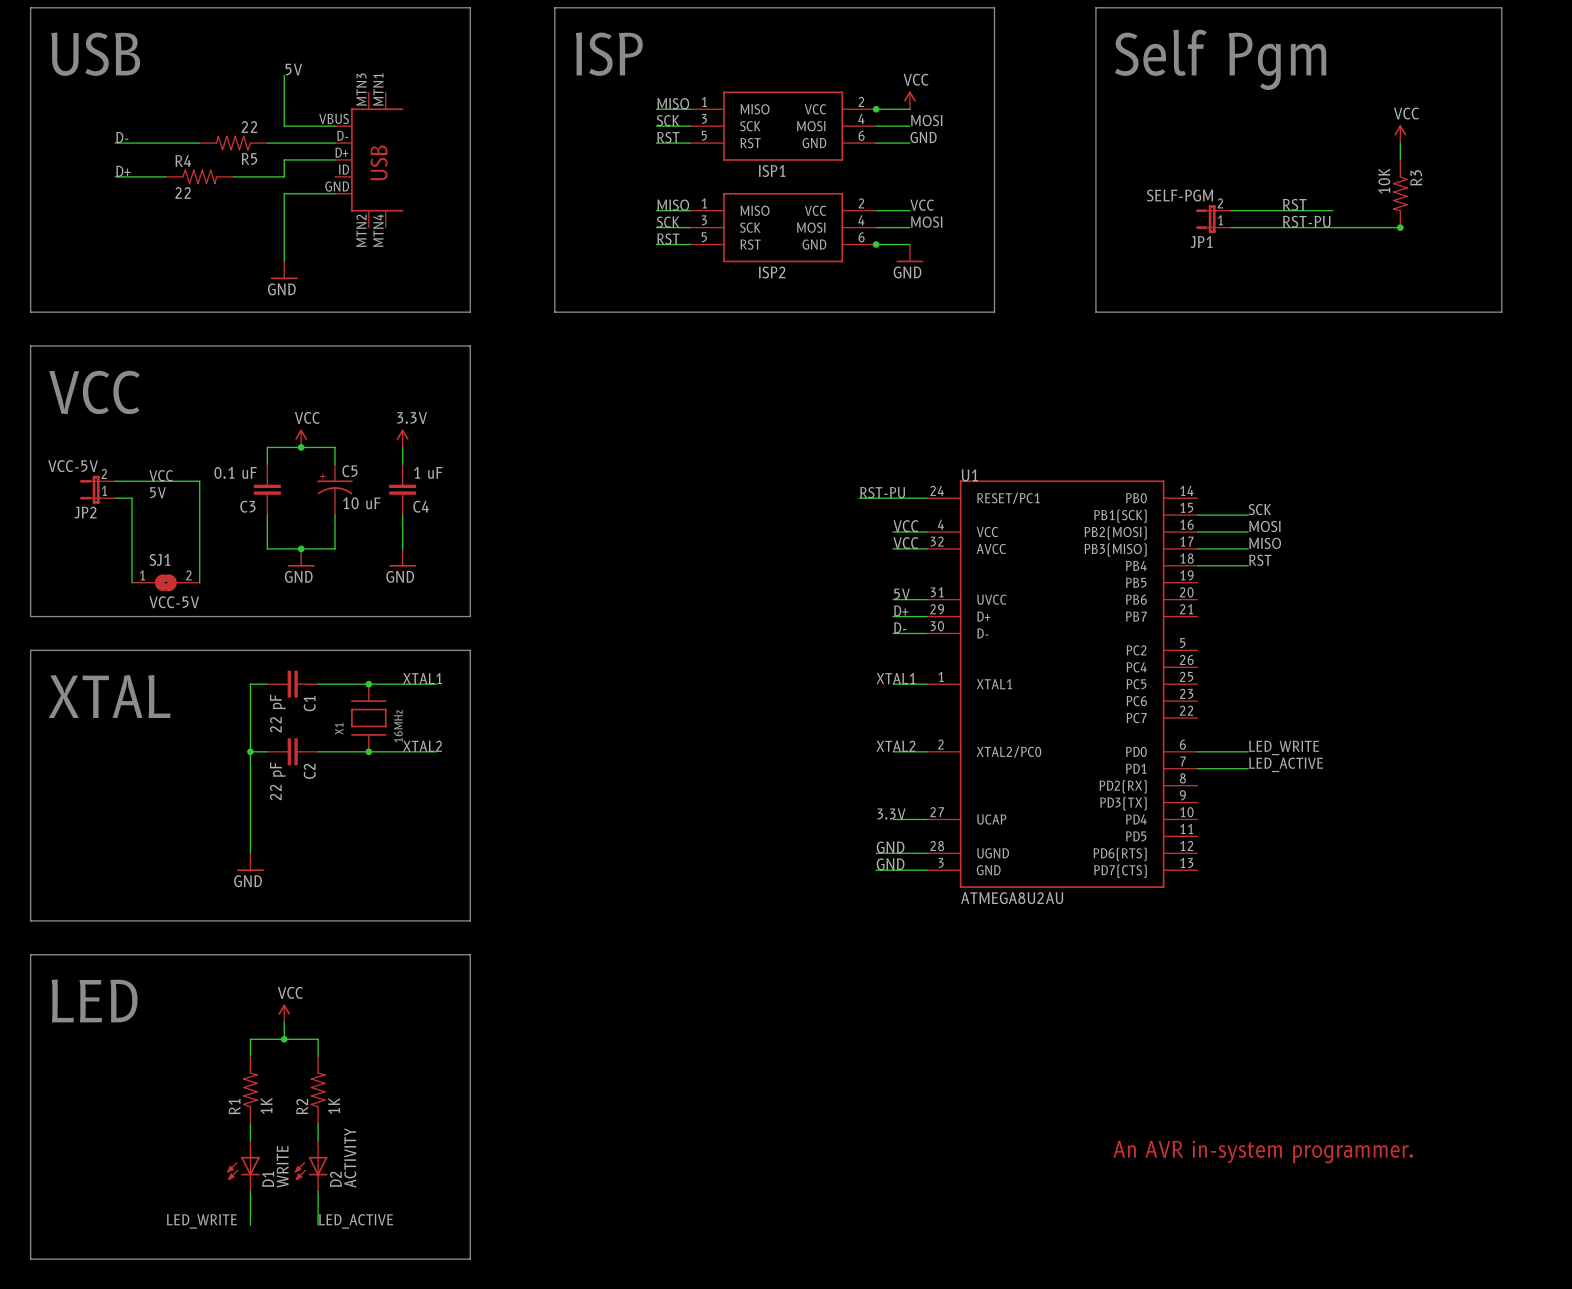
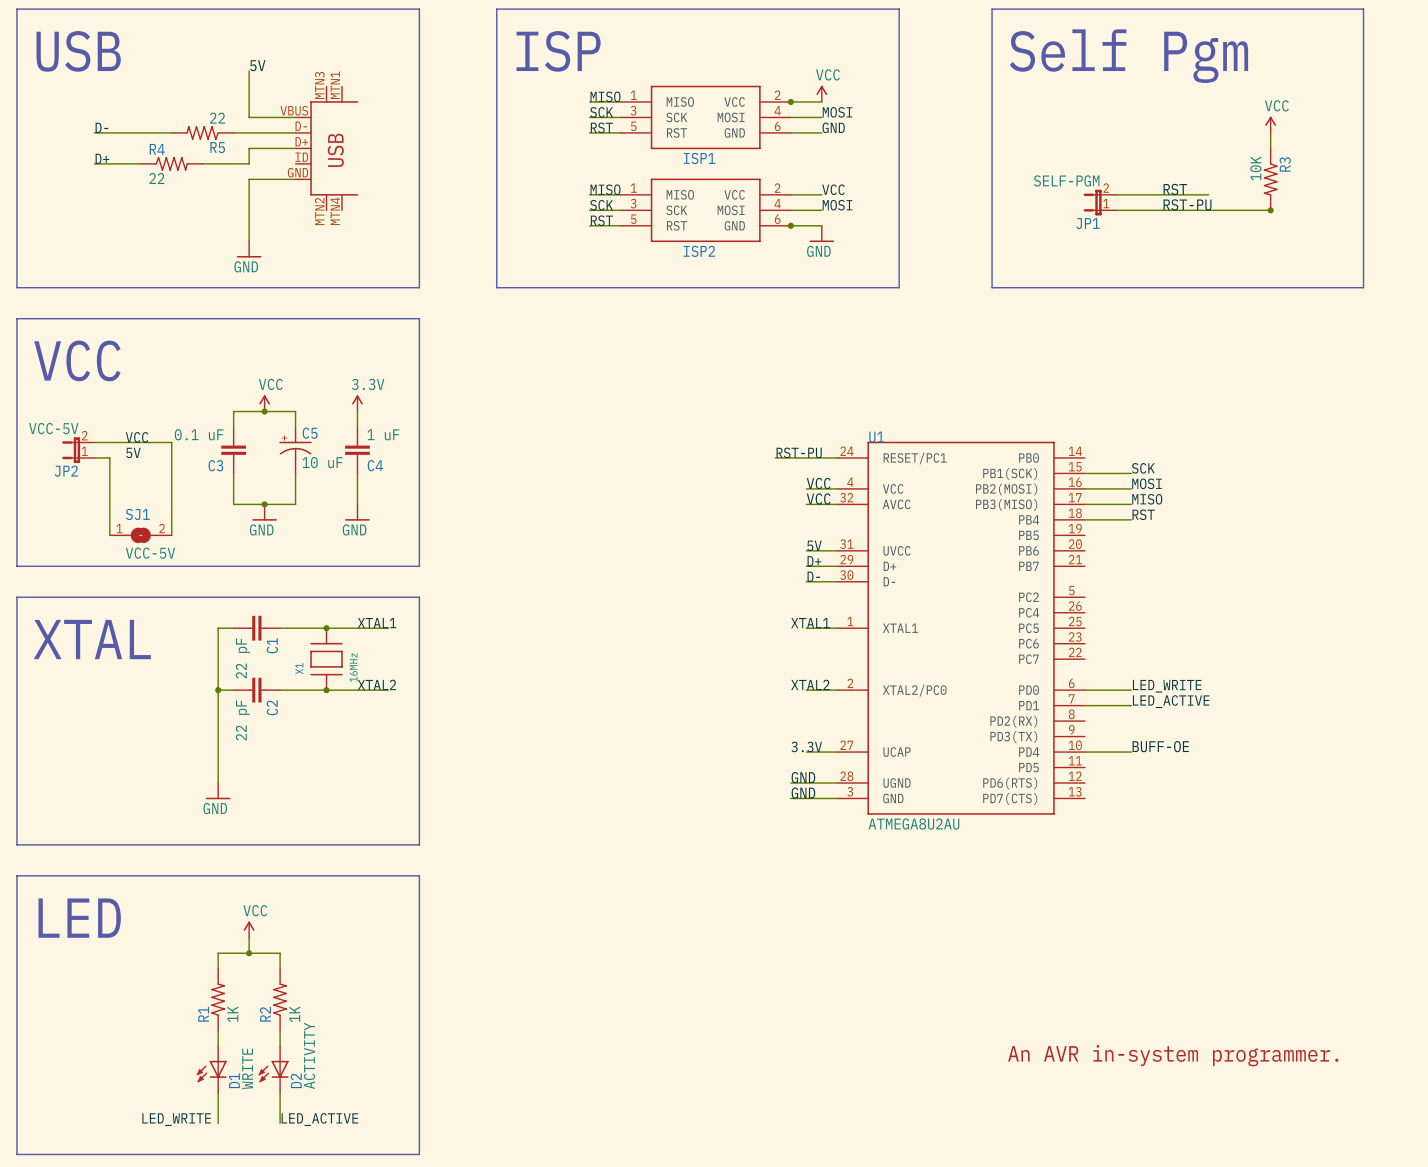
label: none -> BUFF-OE (1160, 746)
wire: none -> (1084, 752) (1131, 752)

